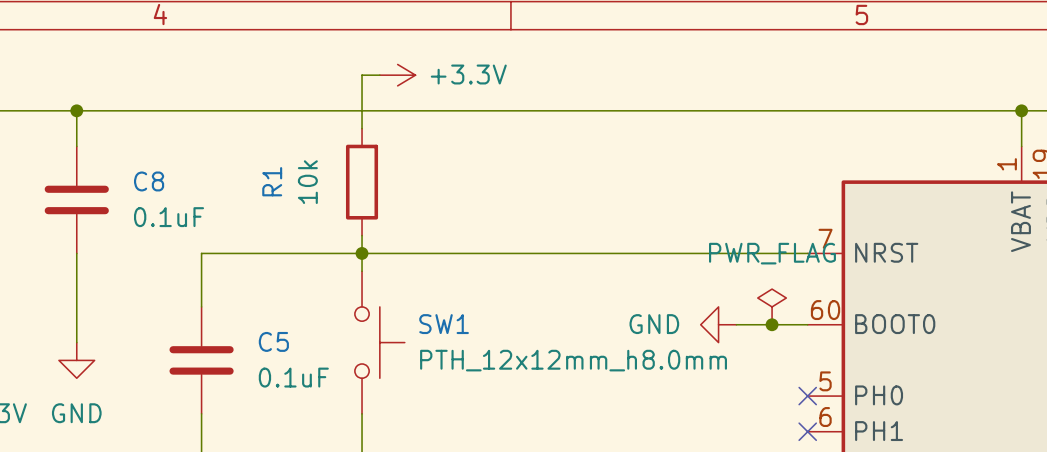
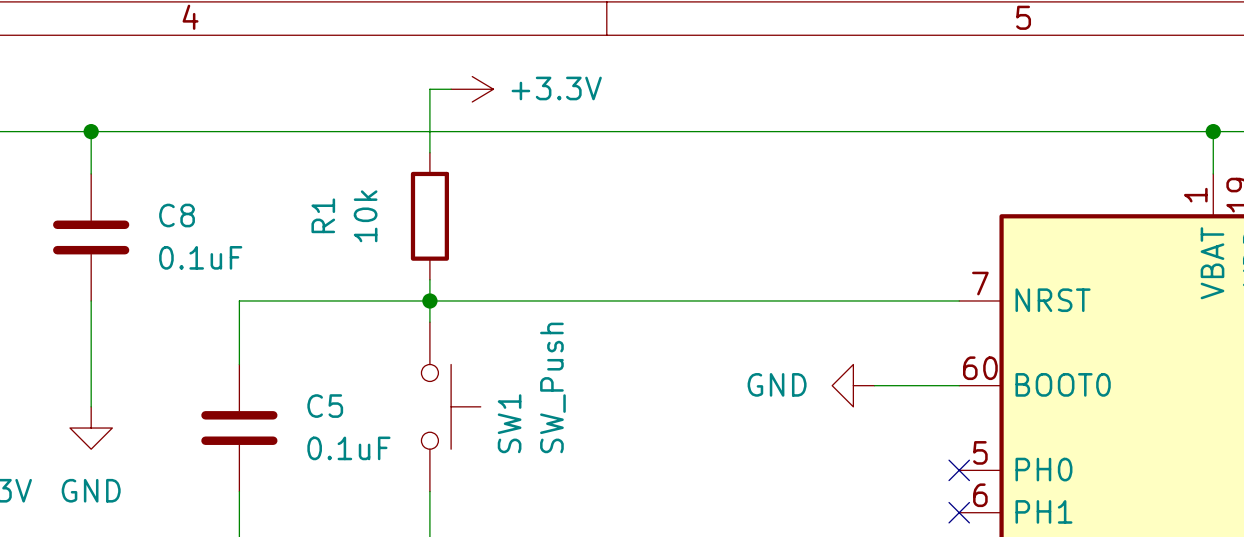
power symbol: PWR_FLAG (772, 306) -> none
SW1 name rotation: 0° (444, 324) -> 90° counterclockwise (509, 423)
junction: (772, 324) -> none
SW1 value: PTH_12x12mm_h8.0mm (573, 360) -> SW_Push (552, 387)

